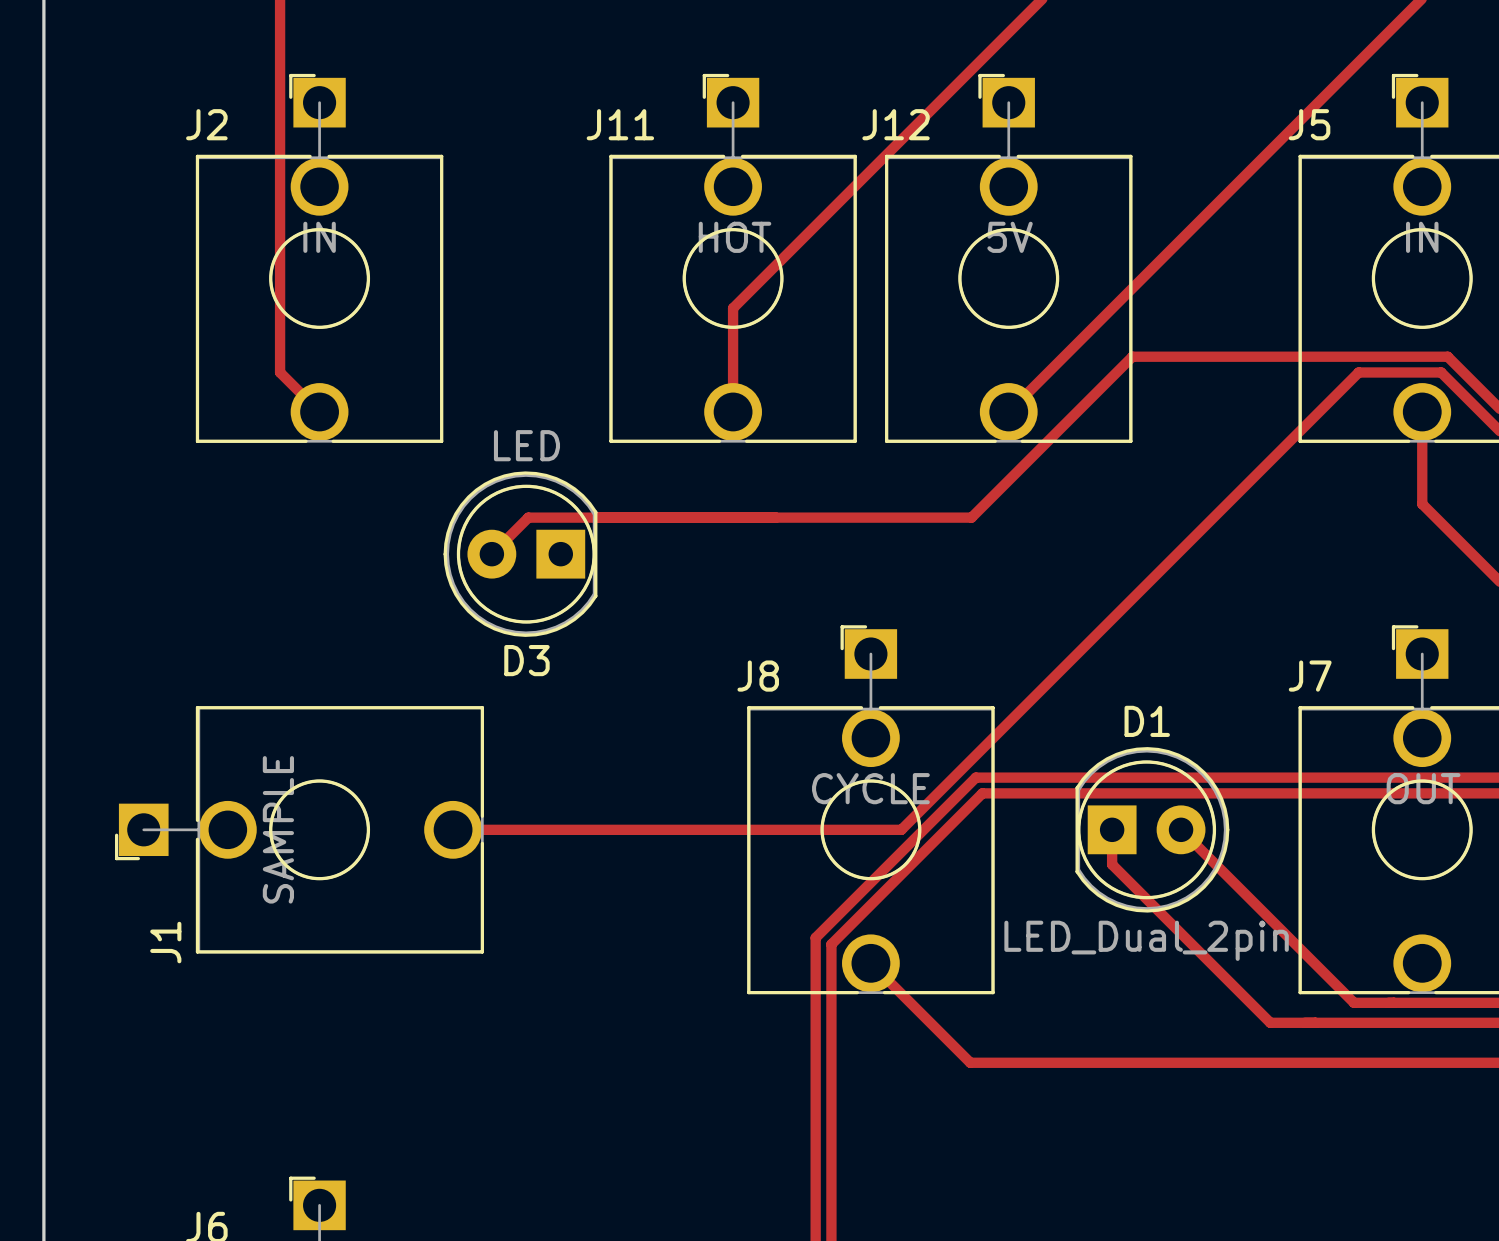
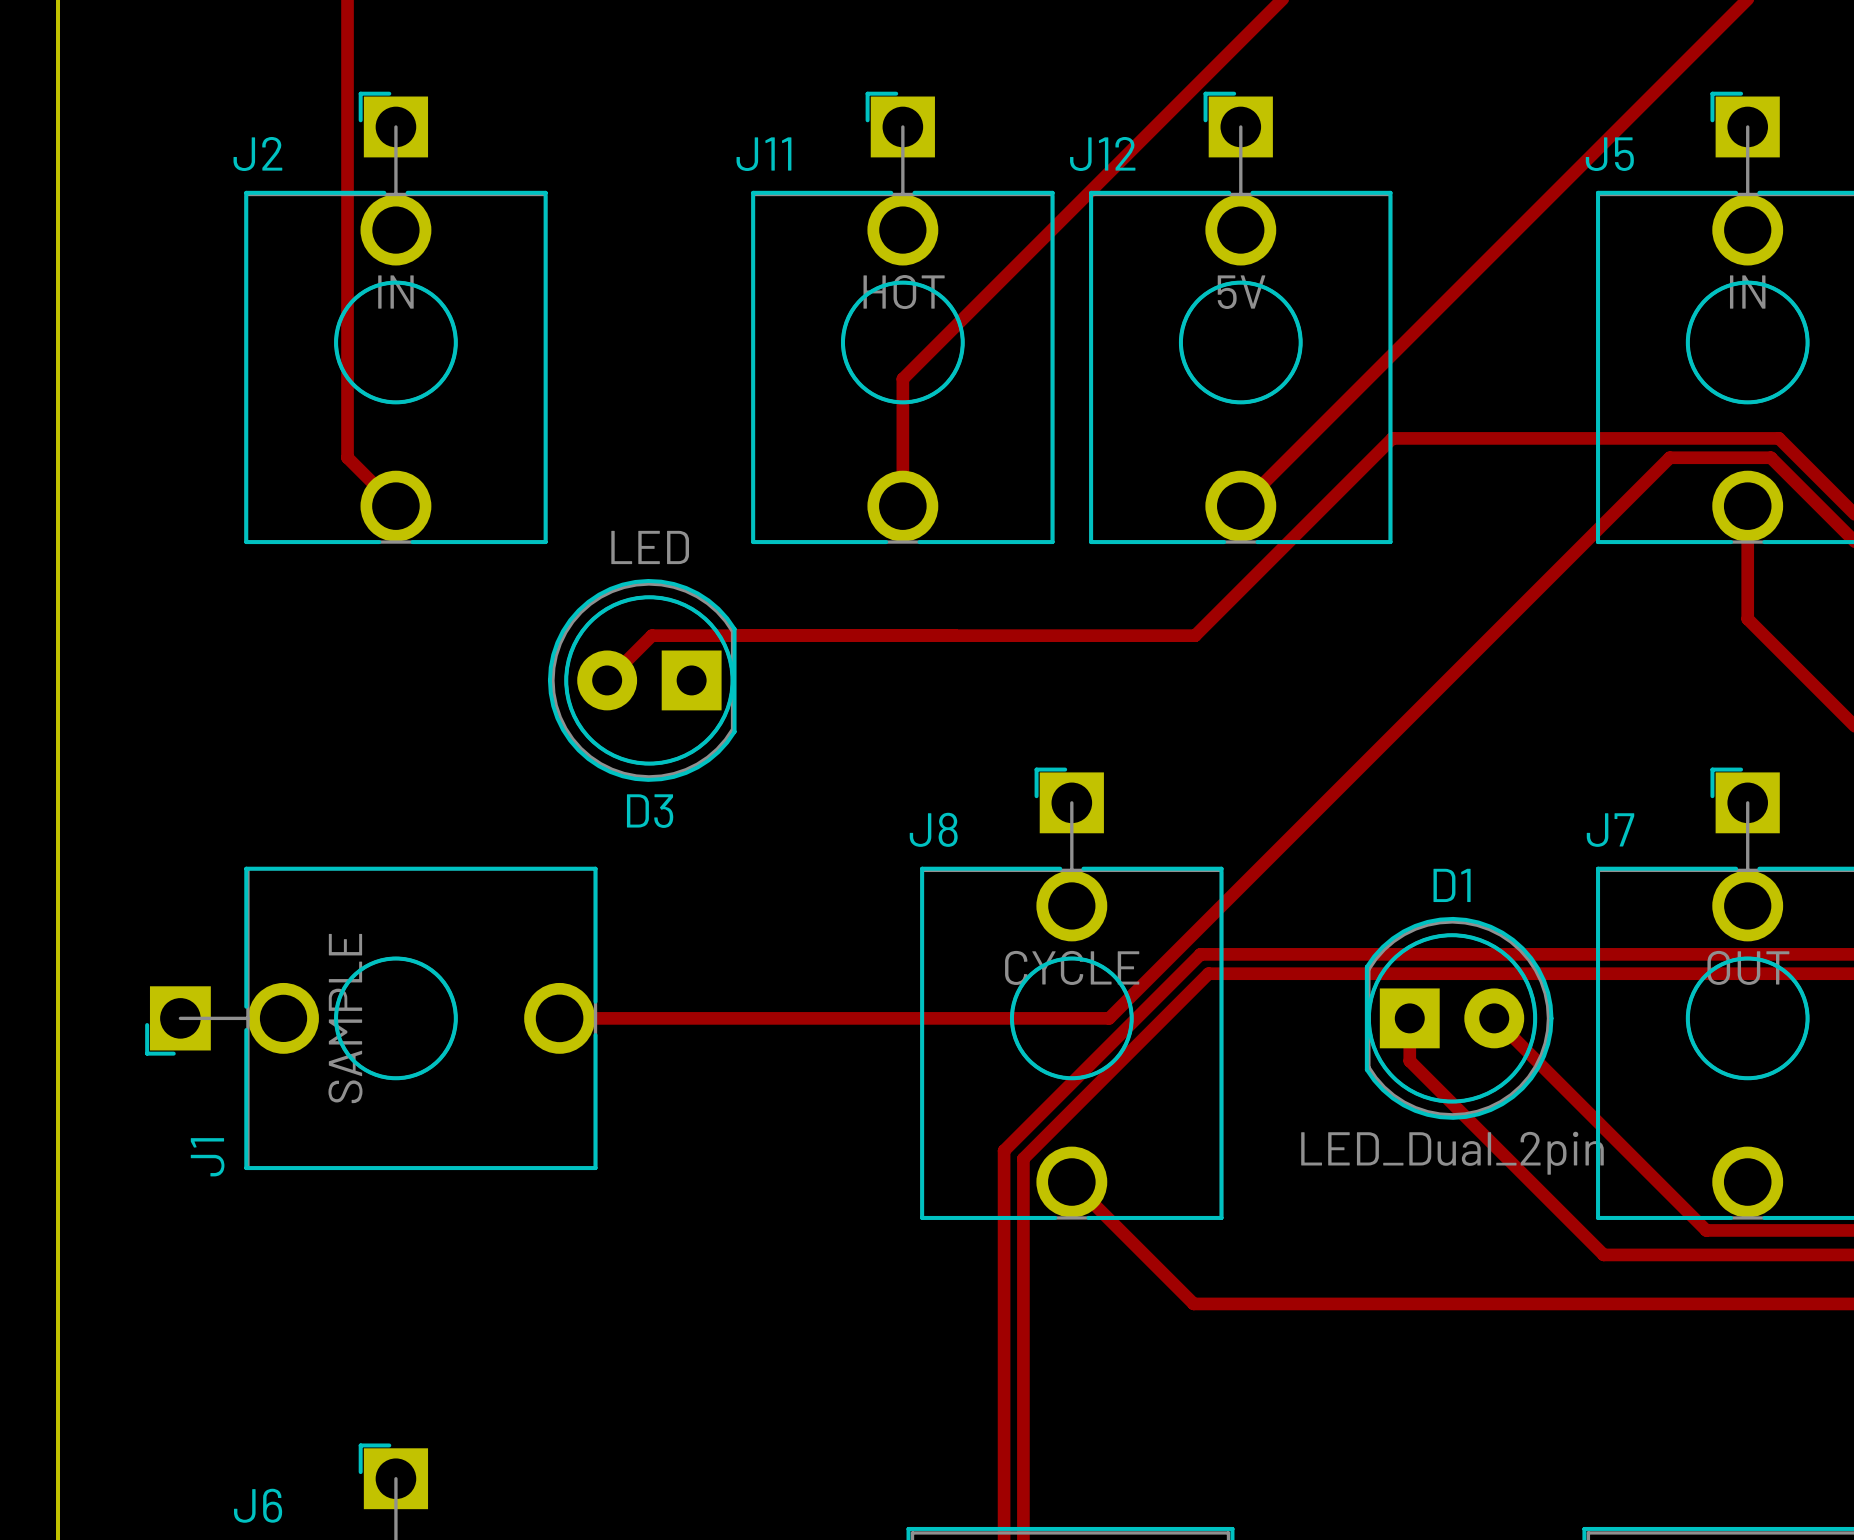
track: (1112, 829) (1112, 864) (1270, 1022) (1304, 1022) -> (1409, 1018) (1409, 1060) (1603, 1254)
D1 position: (1152, 829) -> (1459, 1018)
track: (1181, 829) (1354, 1002) (1388, 1002) -> (1494, 1018) (1706, 1230)

